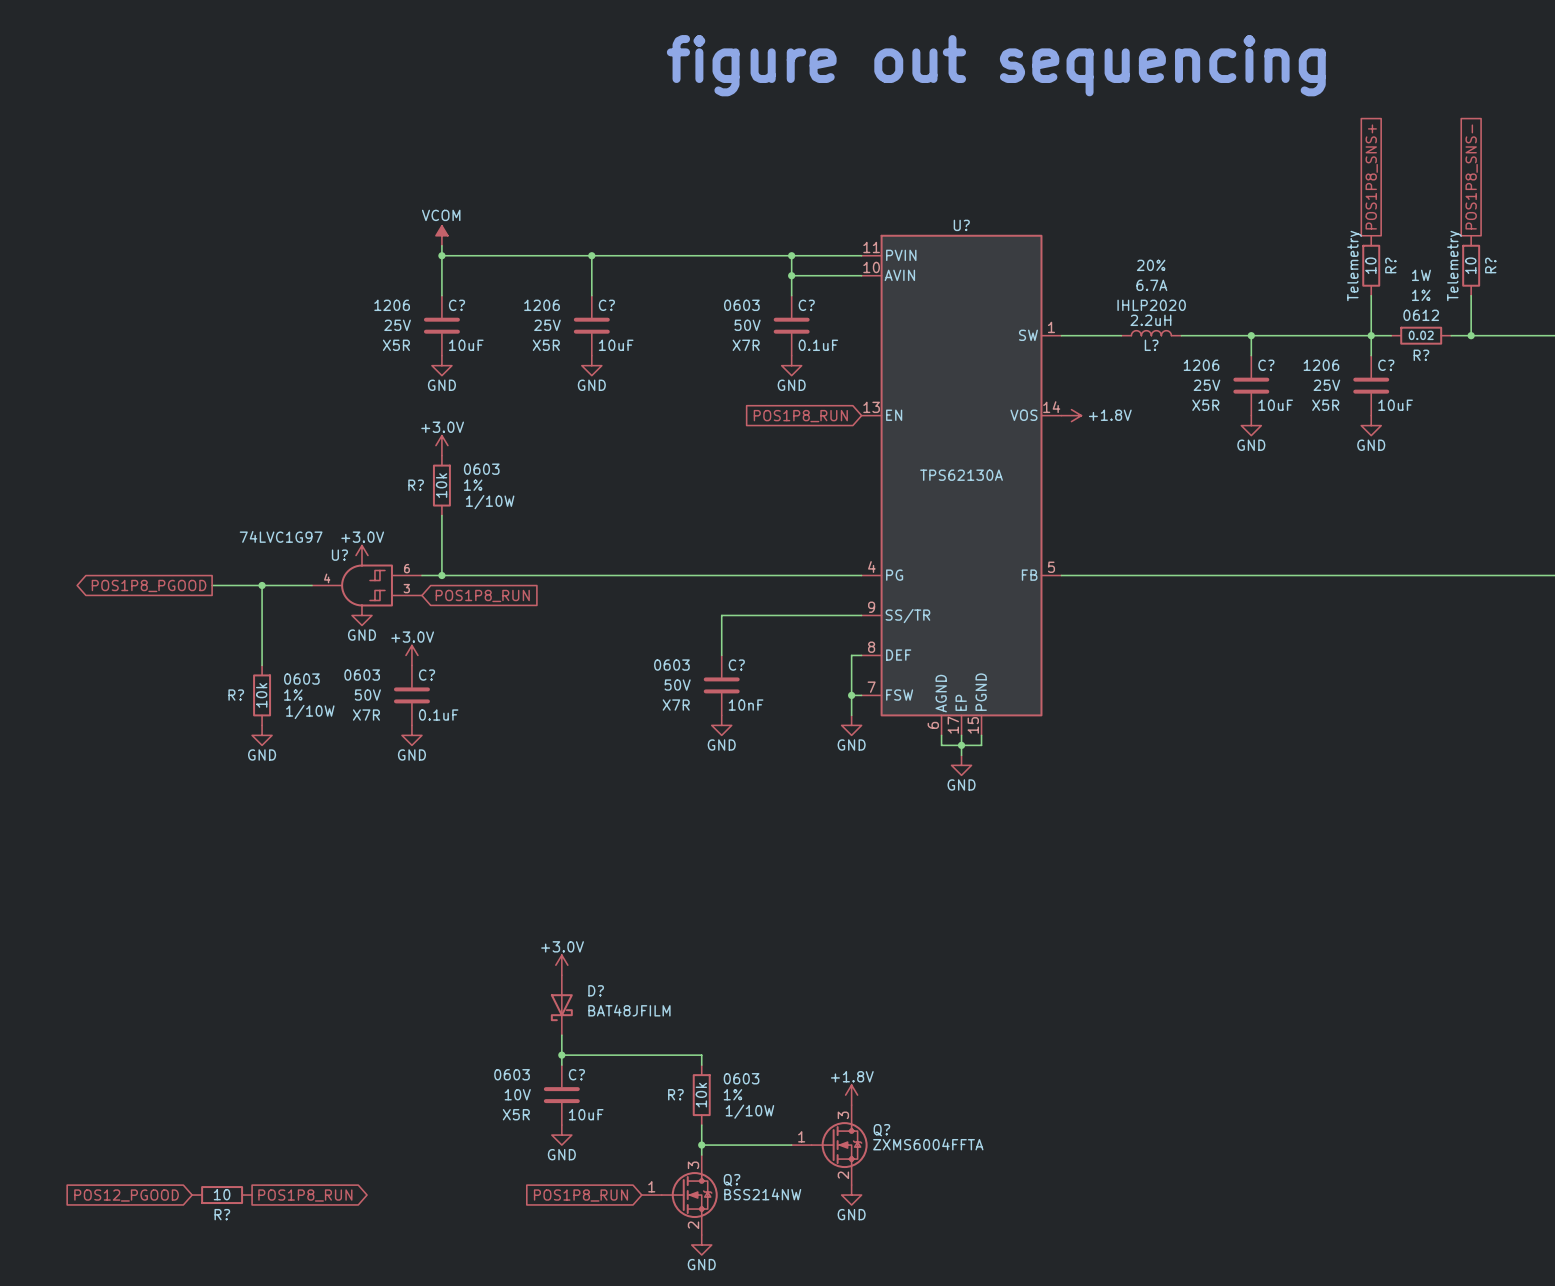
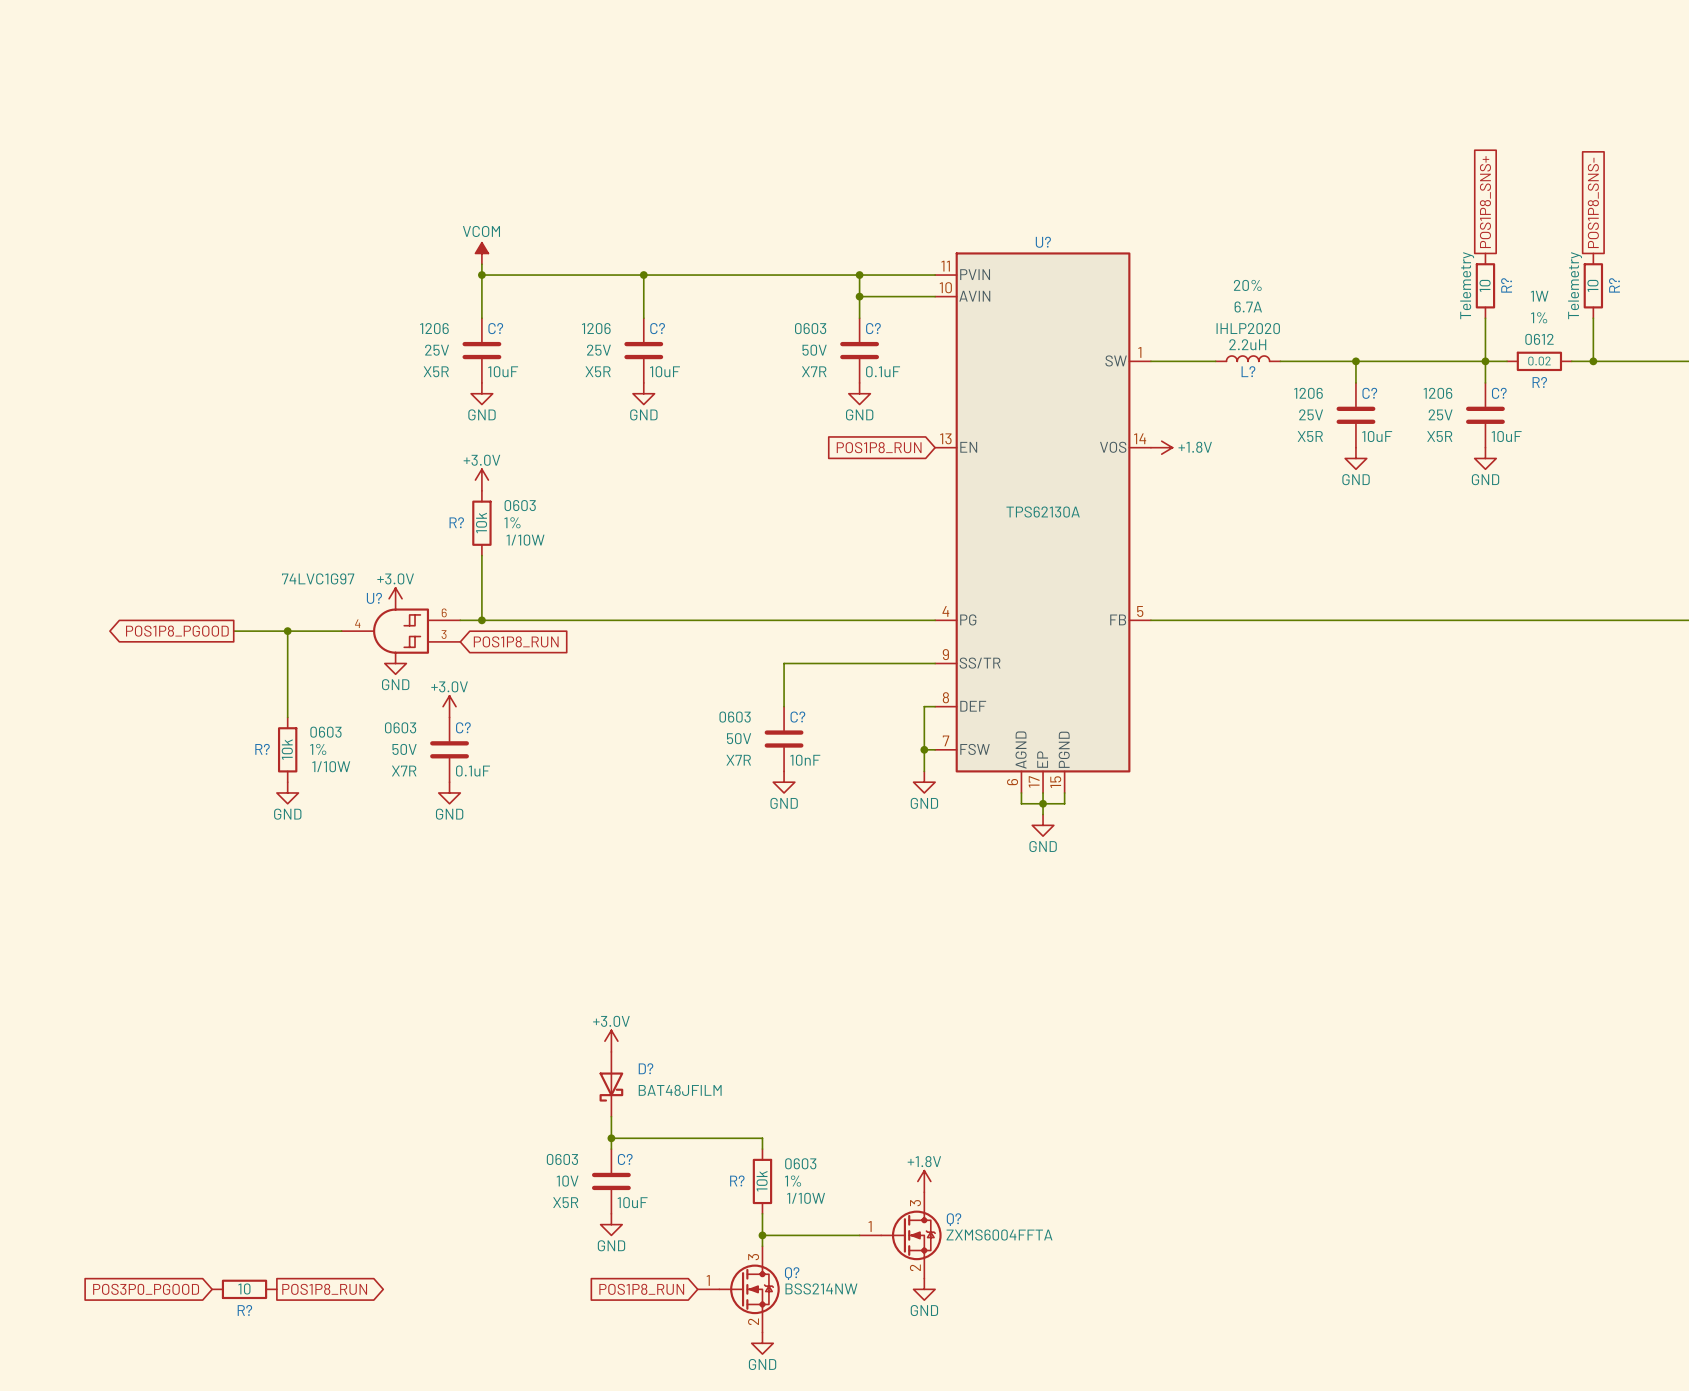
text: figure out sequencing (996, 65) -> none
global label: POS12_PGOOD (126, 1195) -> POS3P0_PGOOD (146, 1289)

